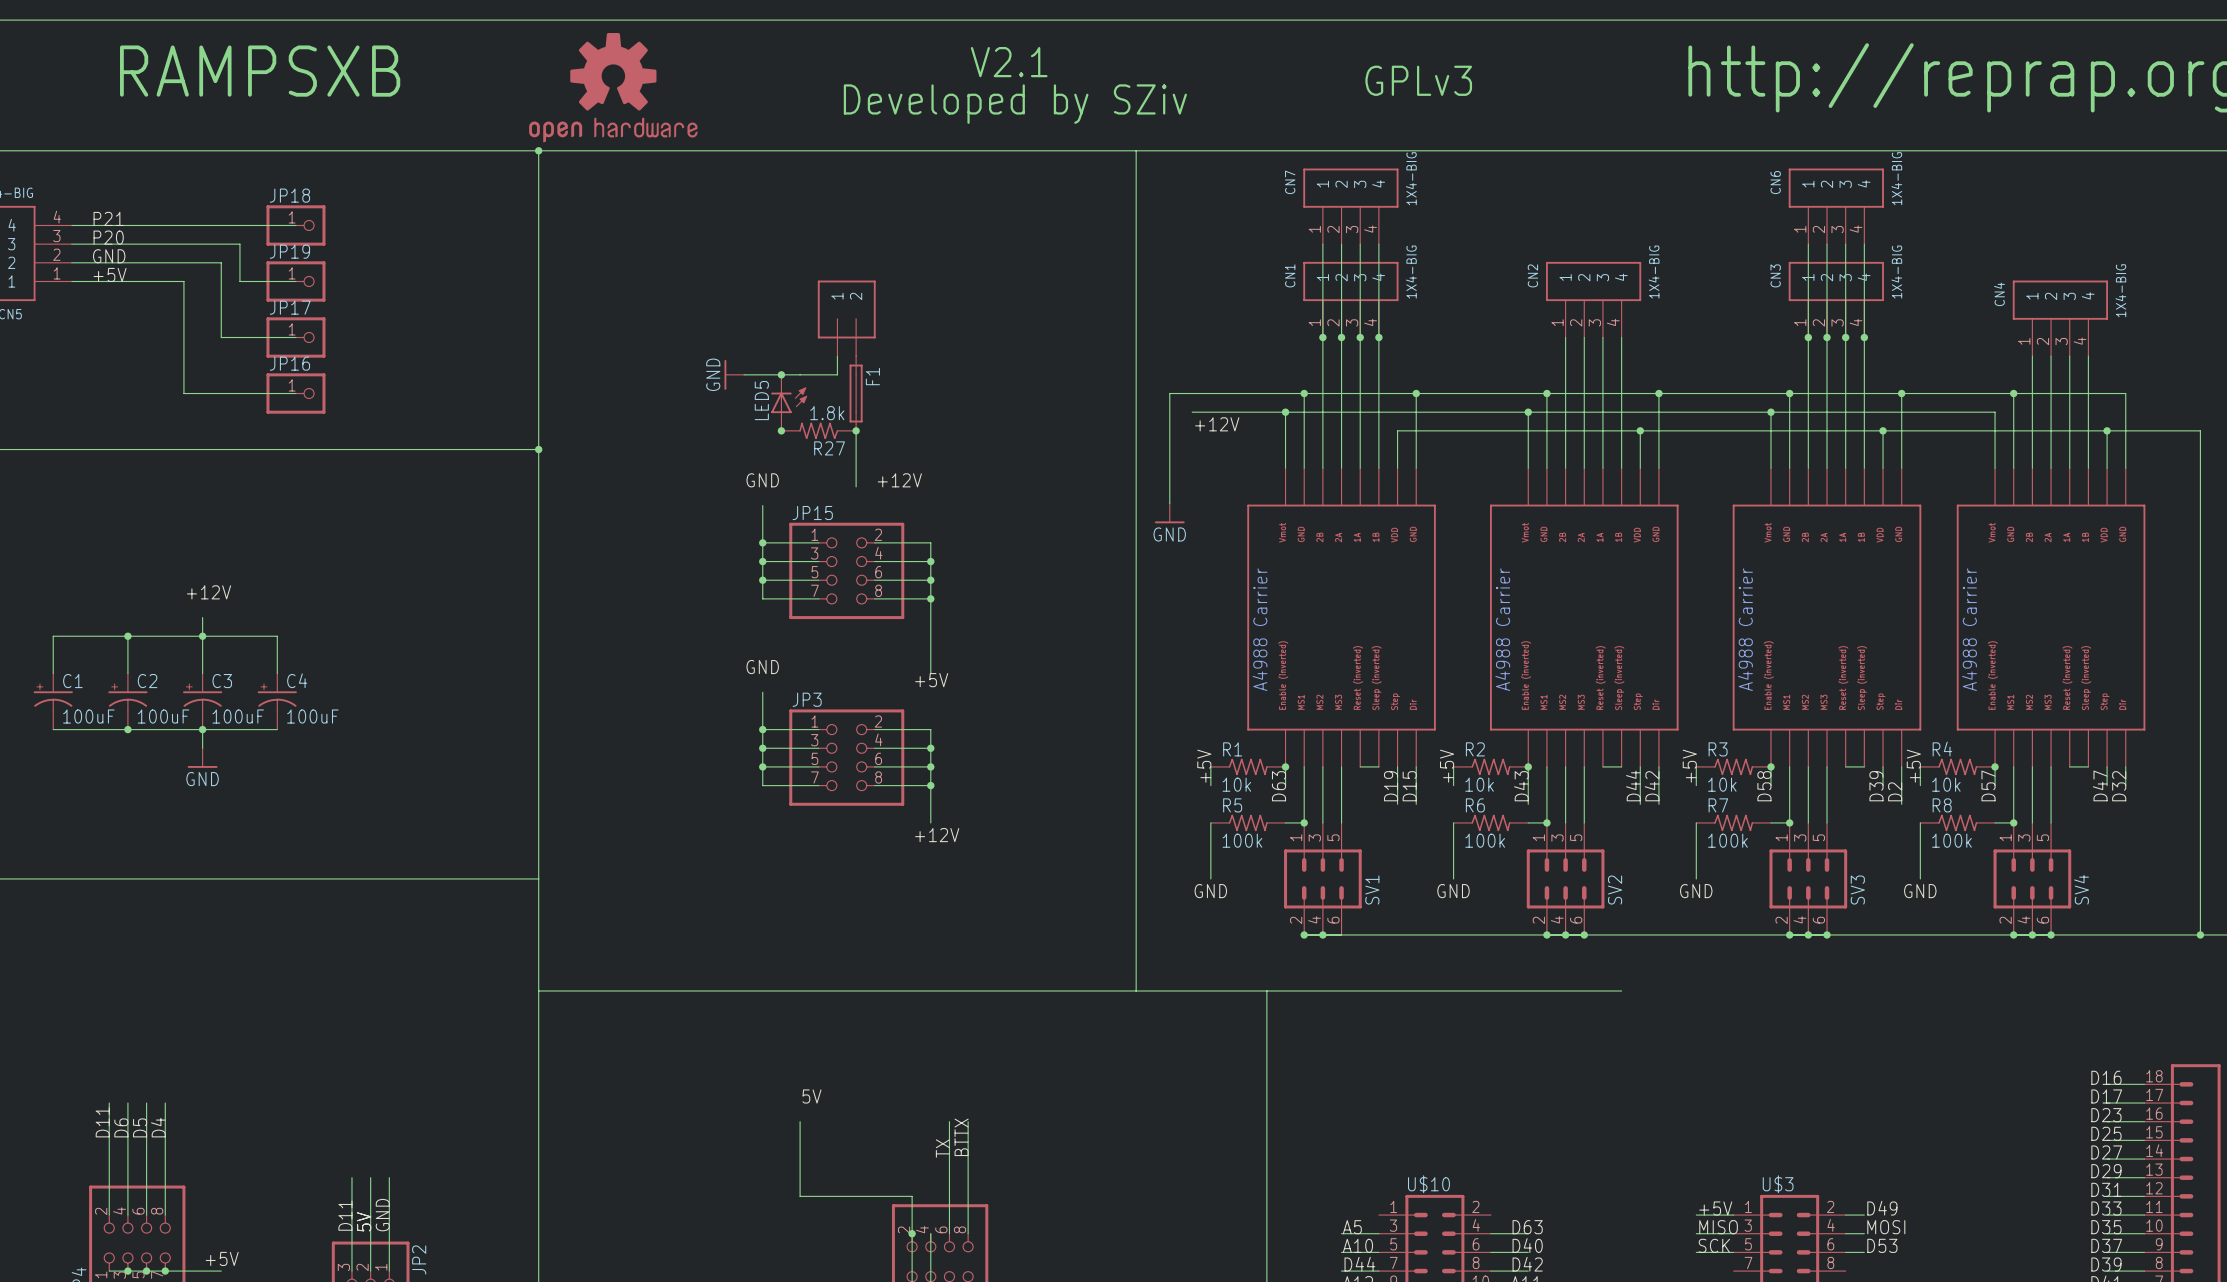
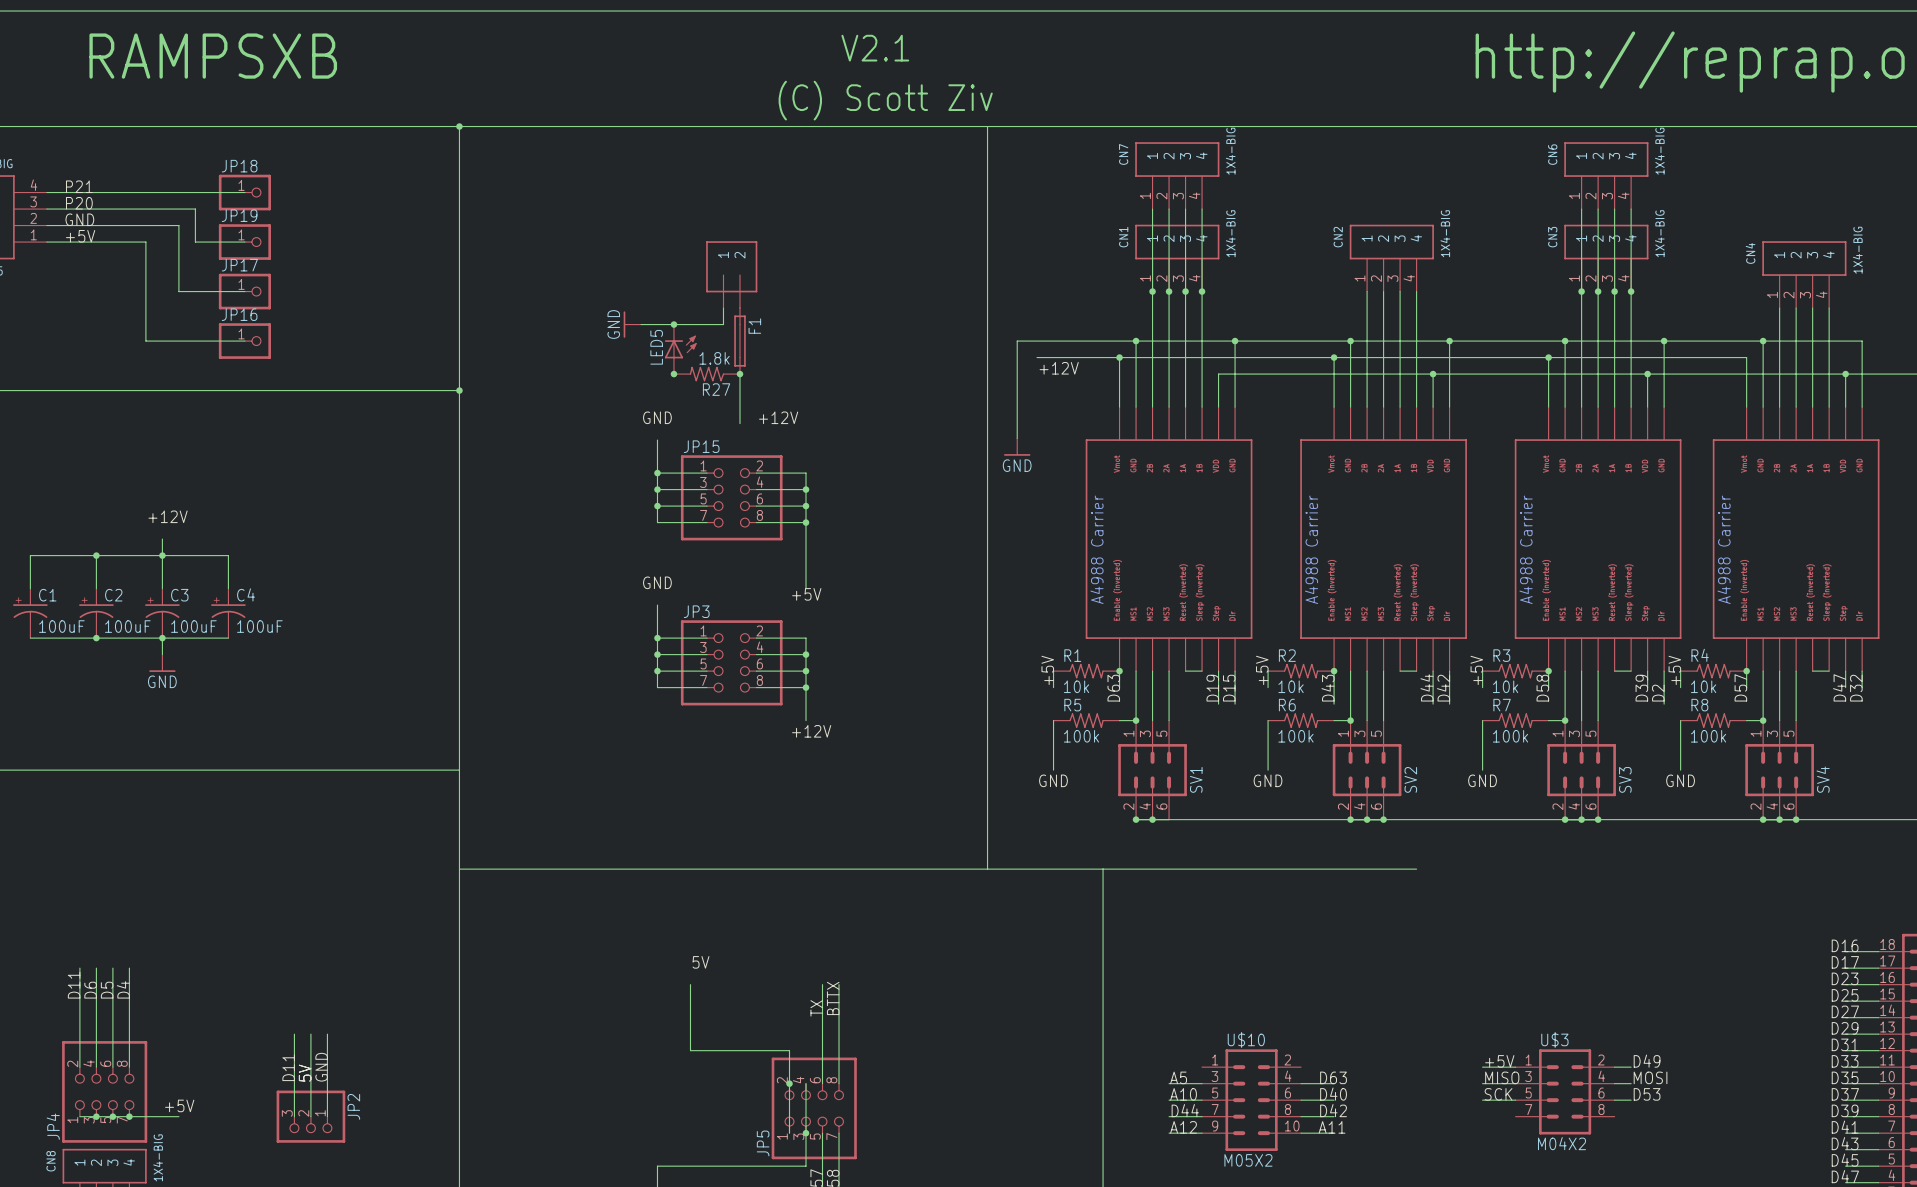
text: GPLv3 (1418, 80) -> none
part: (613, 87) -> none
text: Developed by SZiv (1015, 104) -> none
text: none -> (C) Scott Ziv (885, 100)

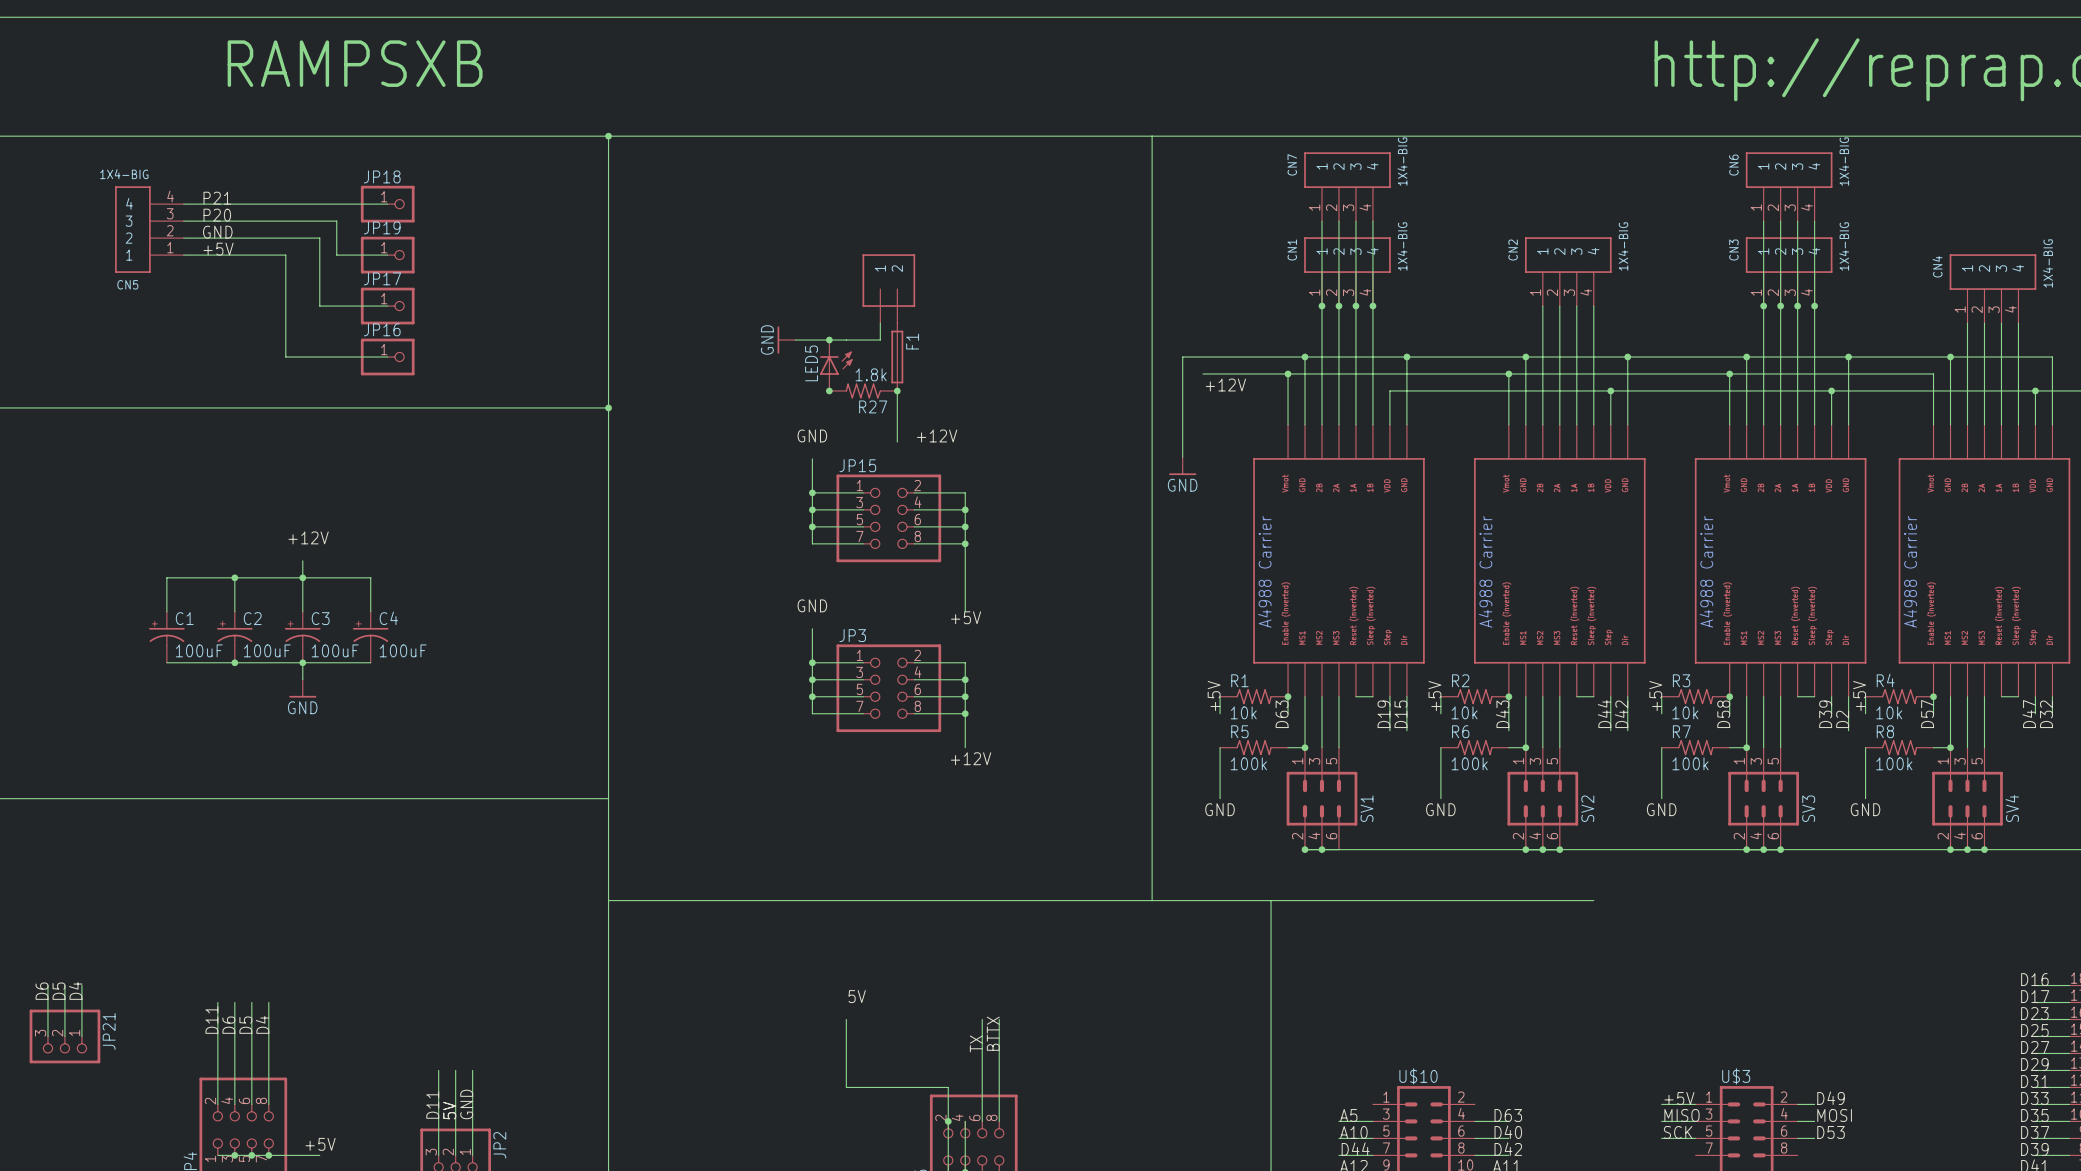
text: V2.1 (875, 48) -> none
text: (C) Scott Ziv (885, 100) -> none

